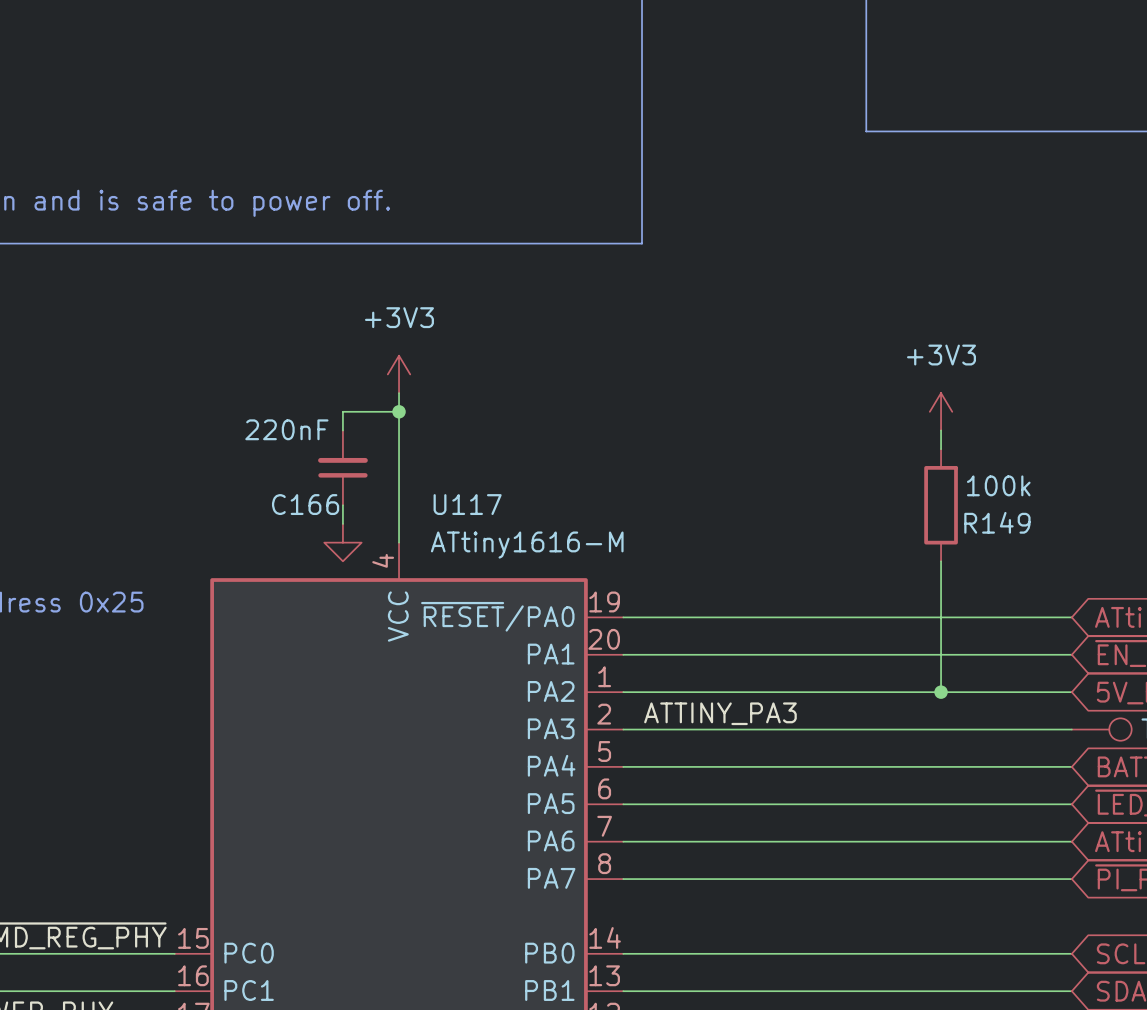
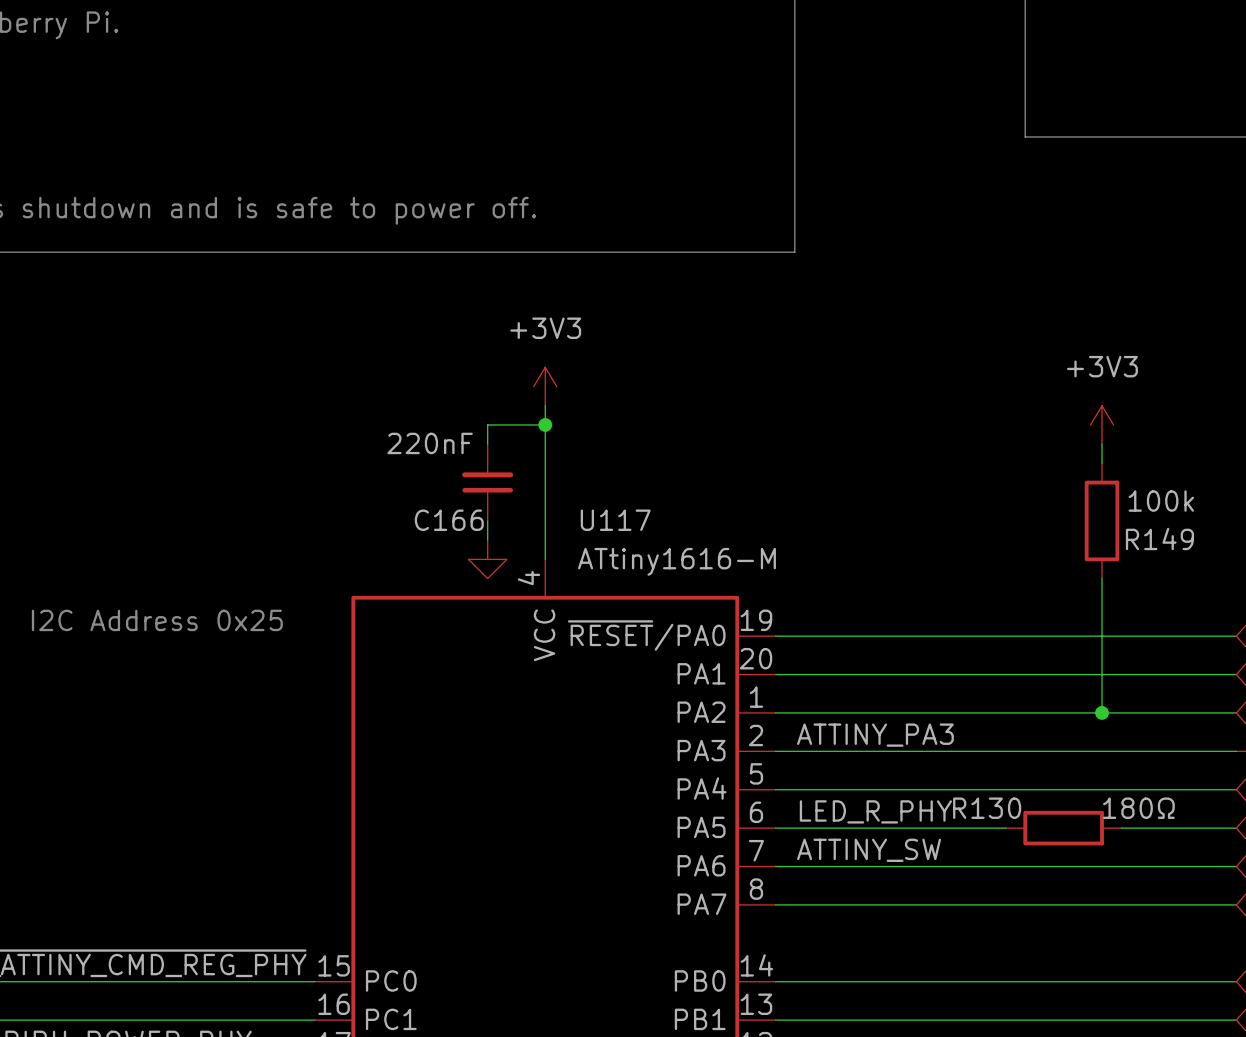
label: none -> LED_R_PHY (875, 811)
wire: (847, 804) (959, 804) -> none
R130: none -> 180Ω (1063, 828)
label: none -> ATTINY_SW (869, 850)

